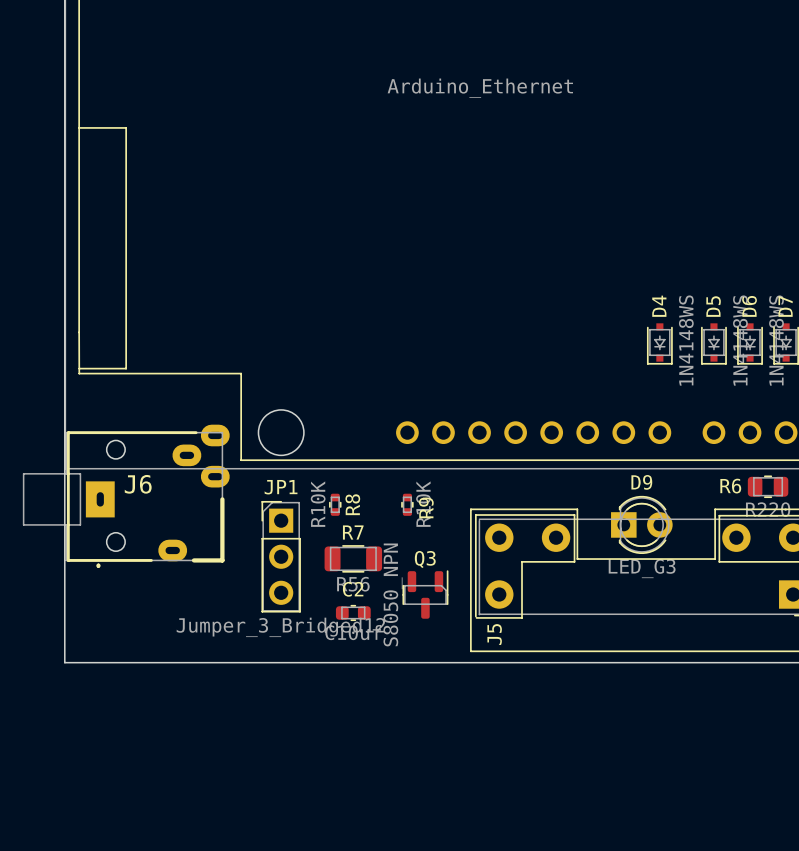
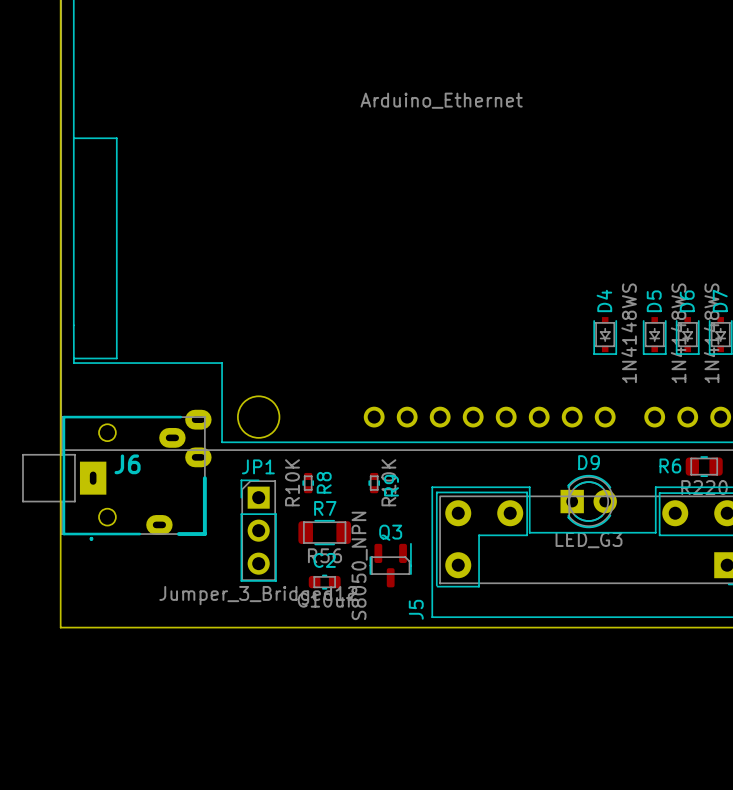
J5 name position: J5 (494, 634) -> J5 (416, 609)

